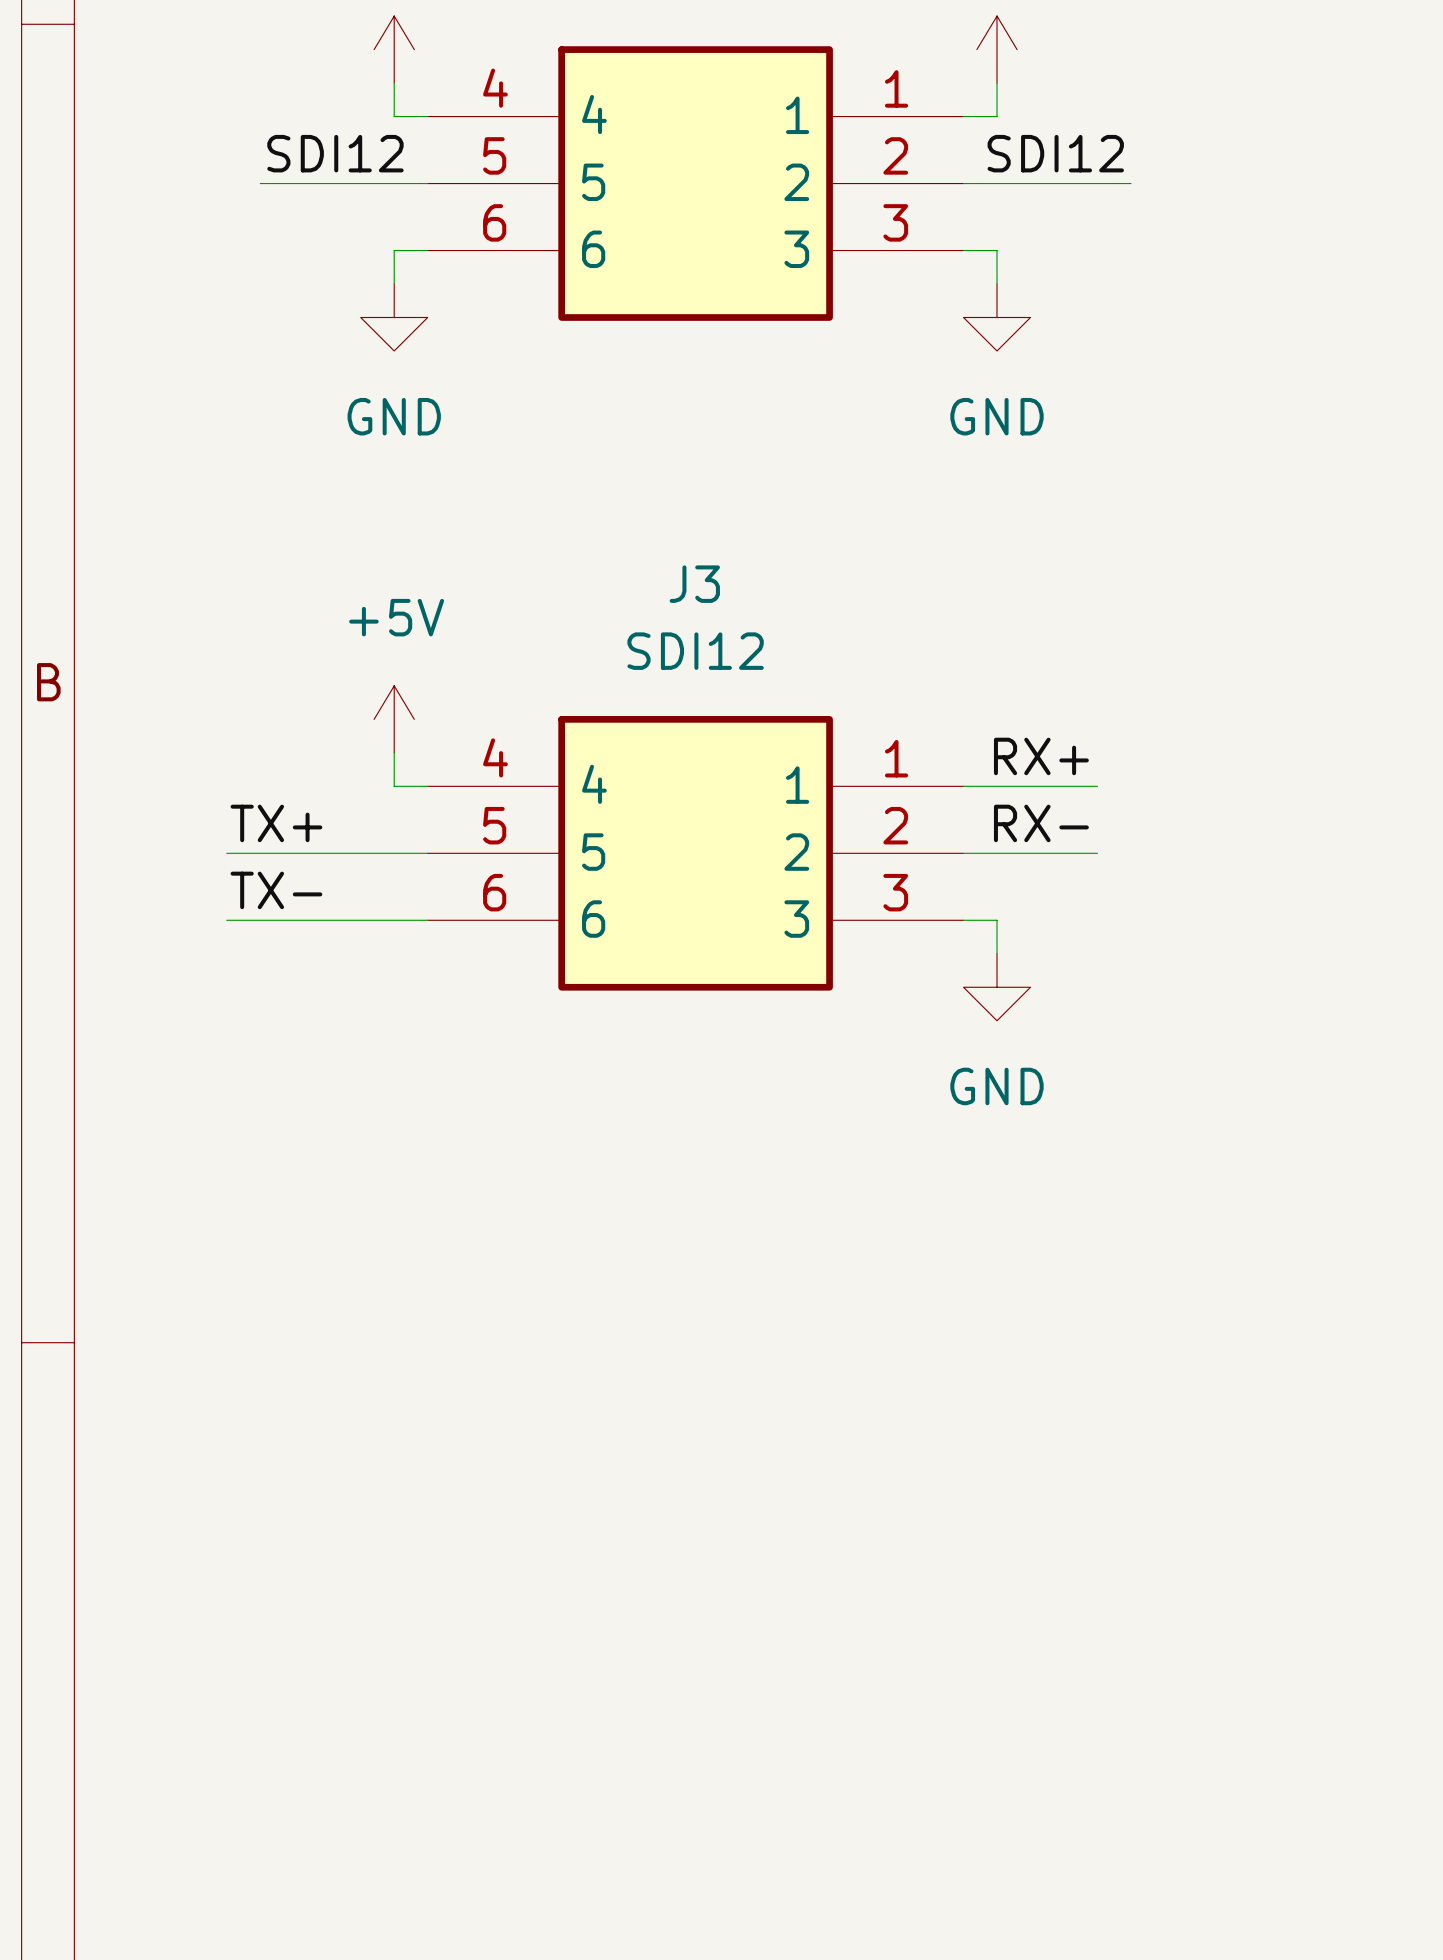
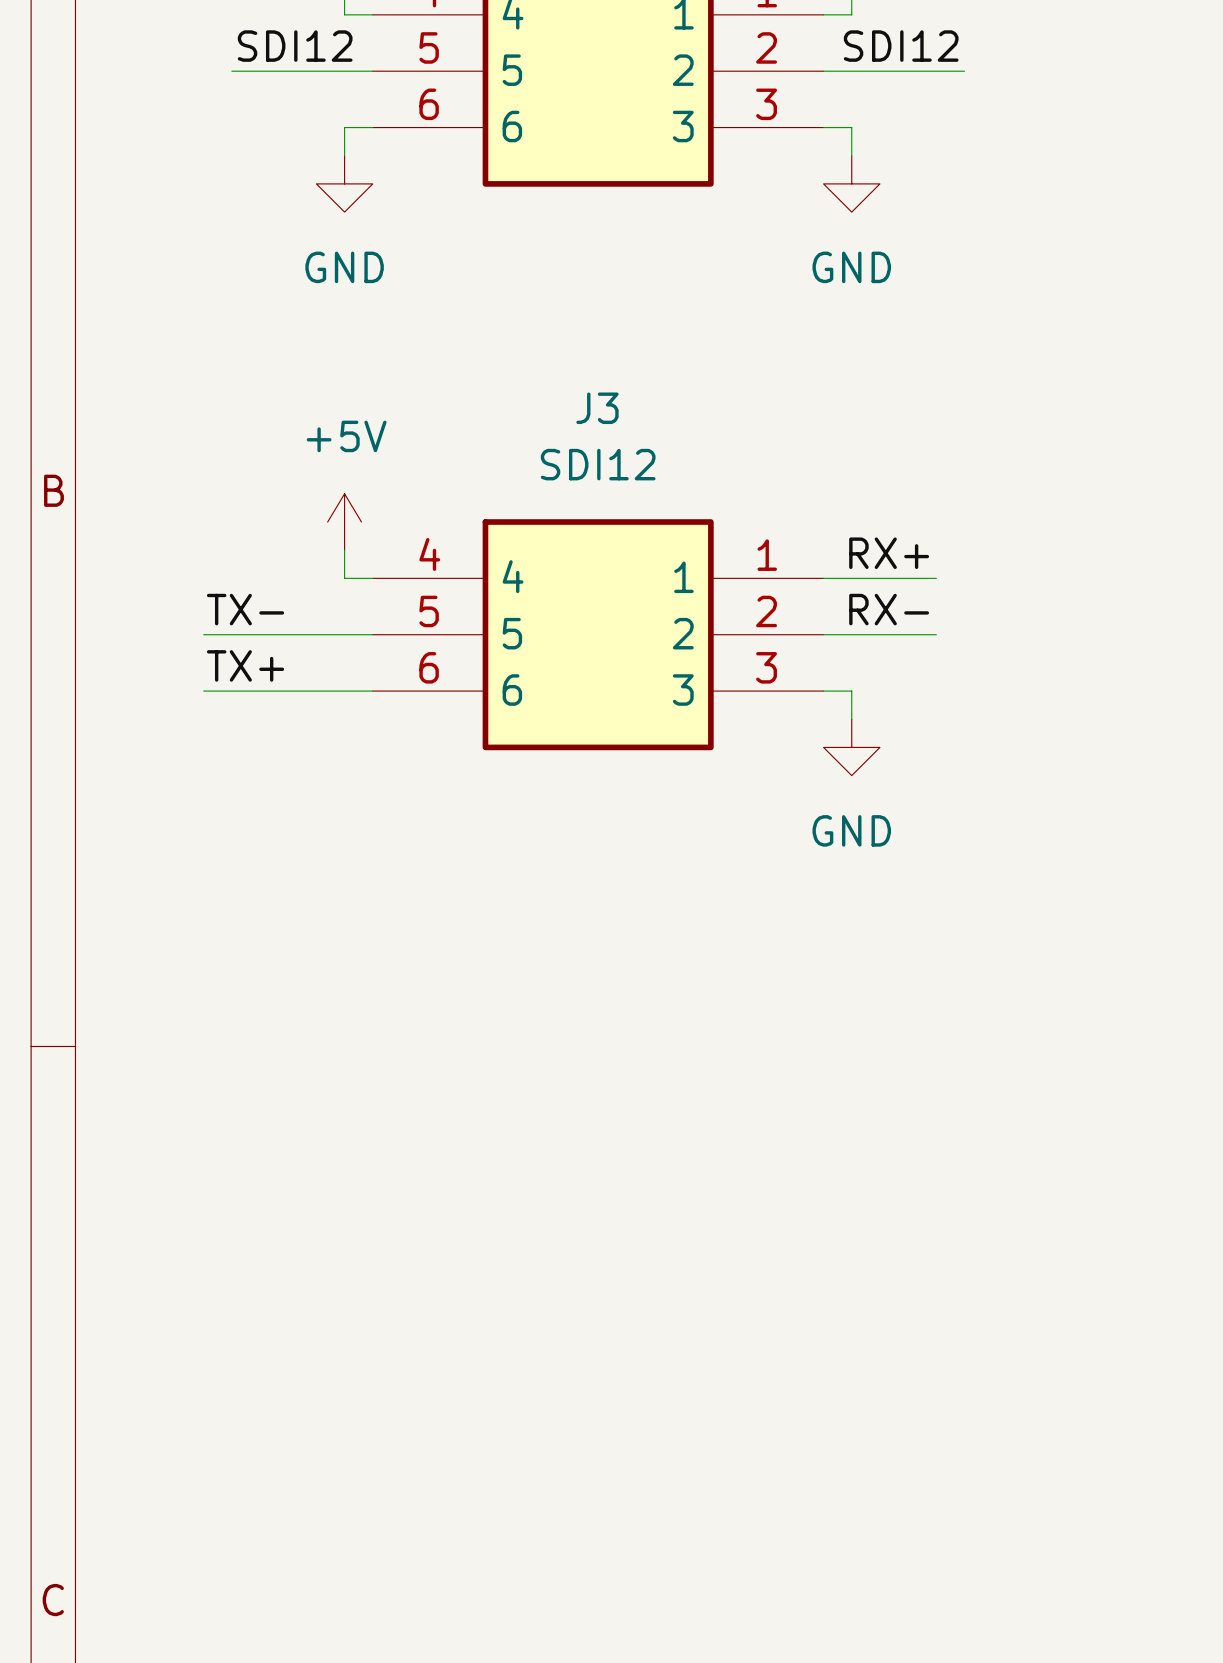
label: TX+ (276, 823) -> TX- (245, 609)
label: TX- (276, 890) -> TX+ (245, 665)

